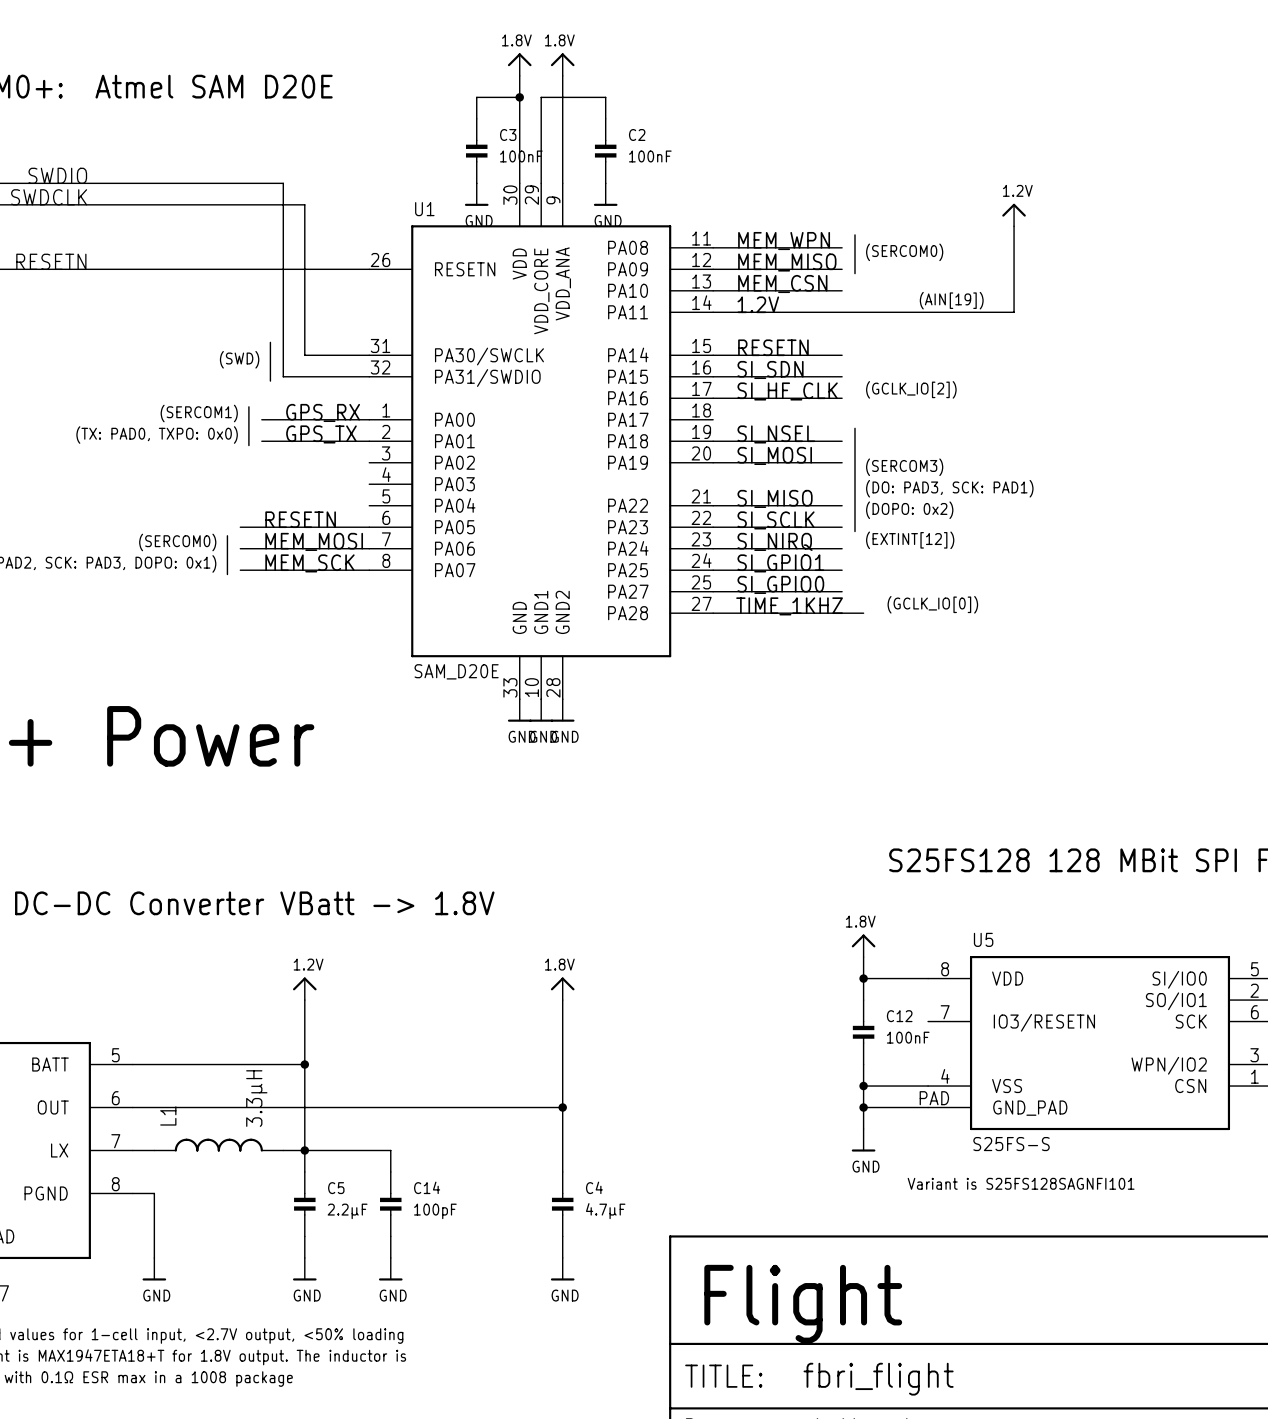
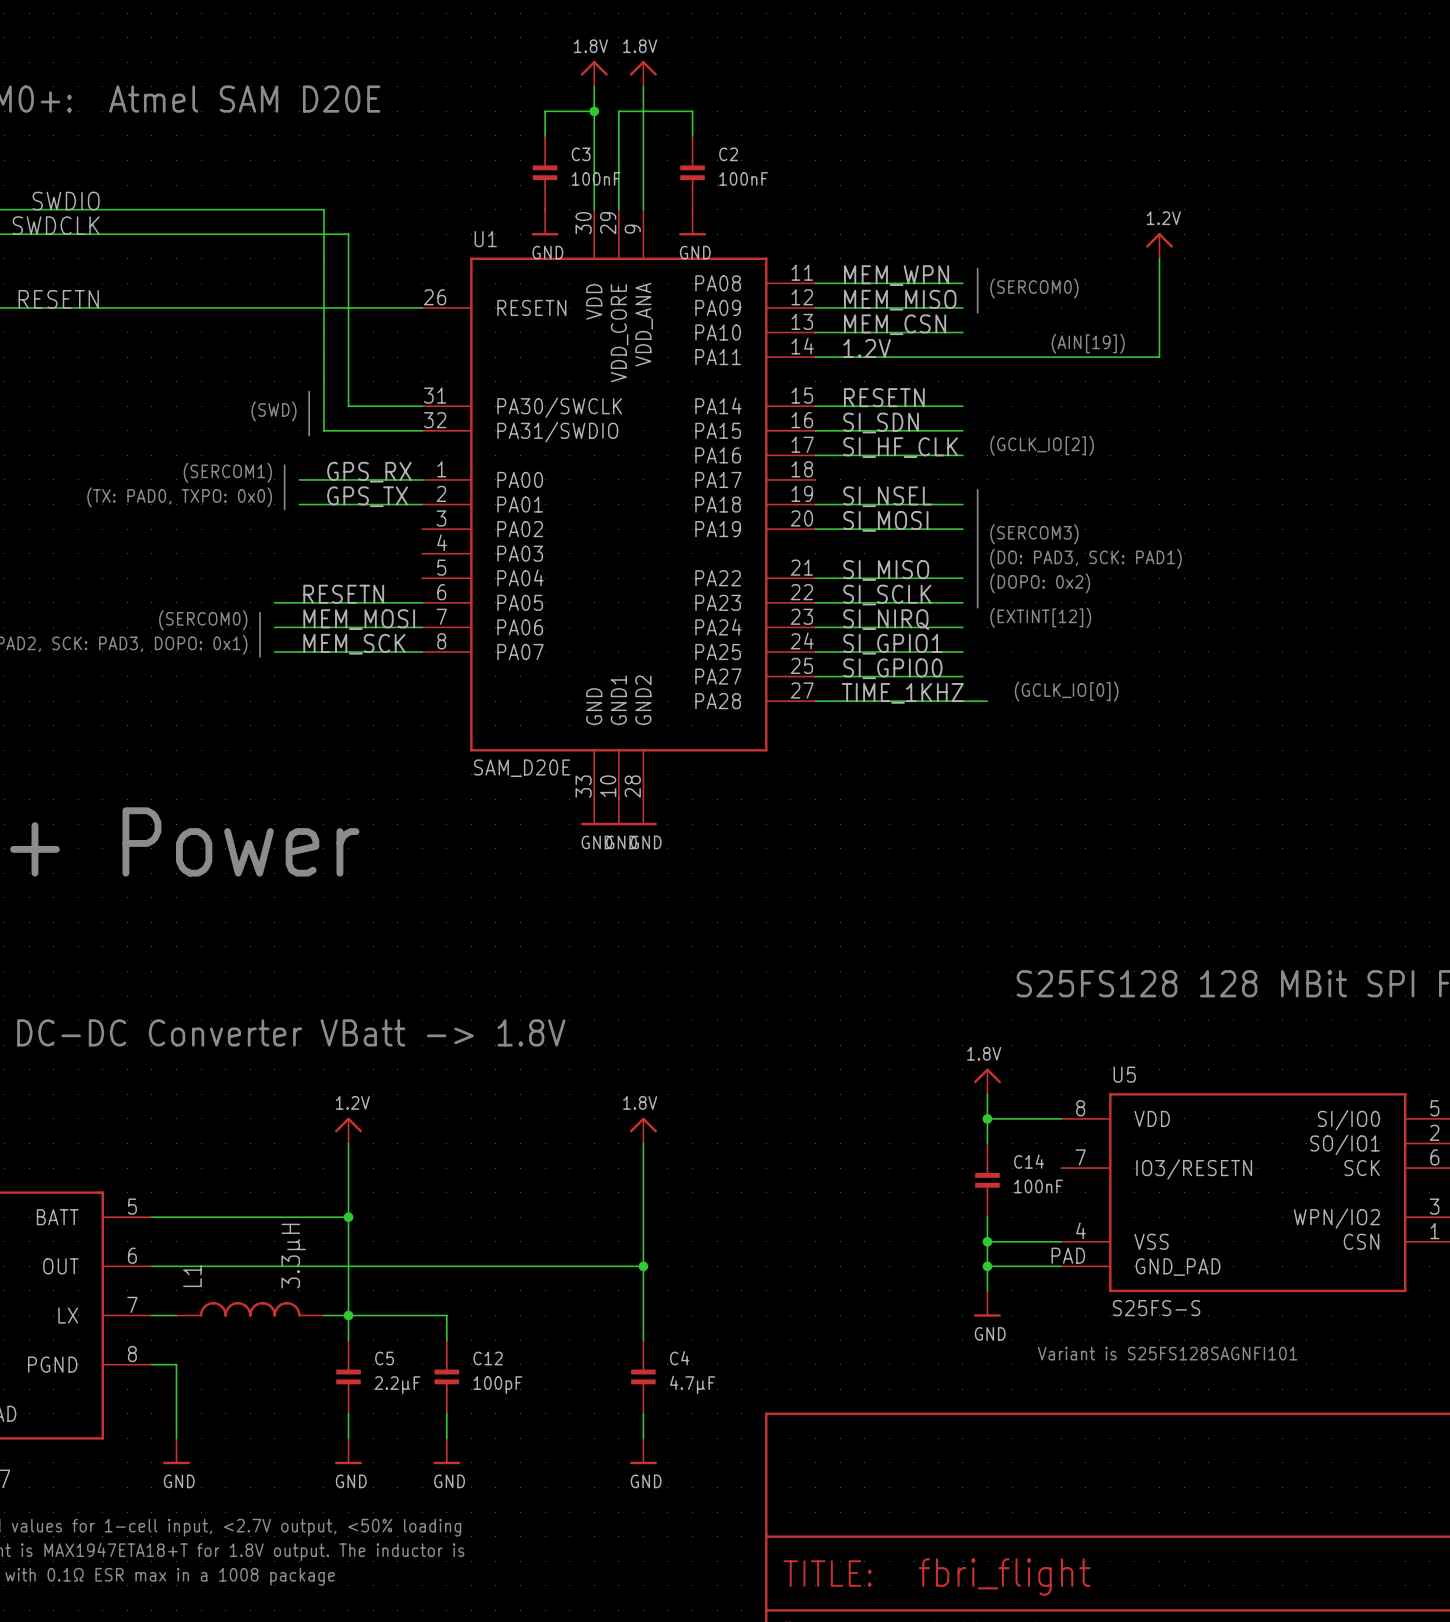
C12 name: C12 (899, 1016) -> C14 (1029, 1161)
C14 name: C14 (427, 1187) -> C12 (488, 1358)
text: Flight (803, 1304) -> none

